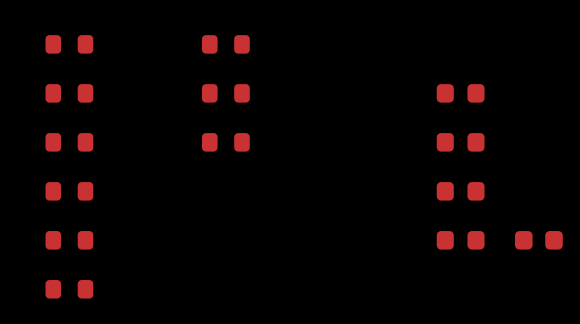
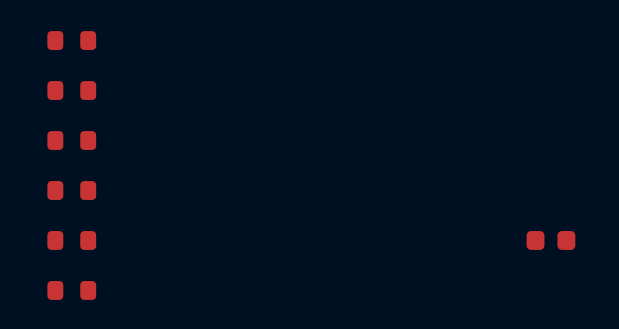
part: (225, 44) -> none
part: (225, 93) -> none
part: (460, 93) -> none
part: (225, 142) -> none
part: (460, 142) -> none
part: (460, 191) -> none
part: (460, 240) -> none

